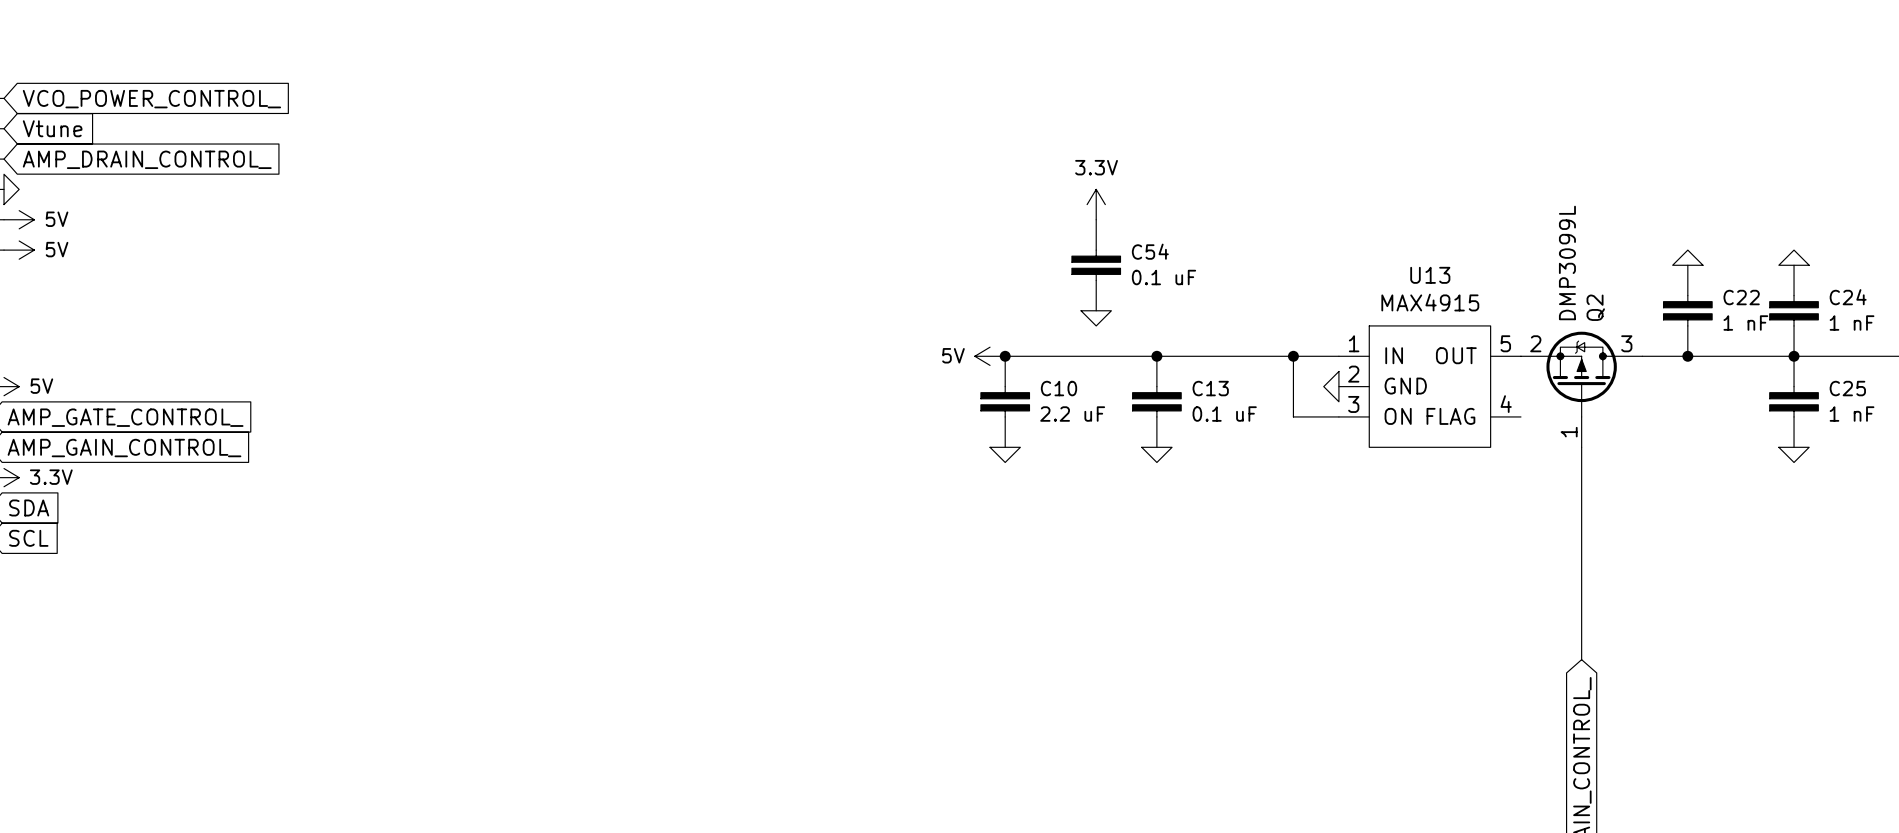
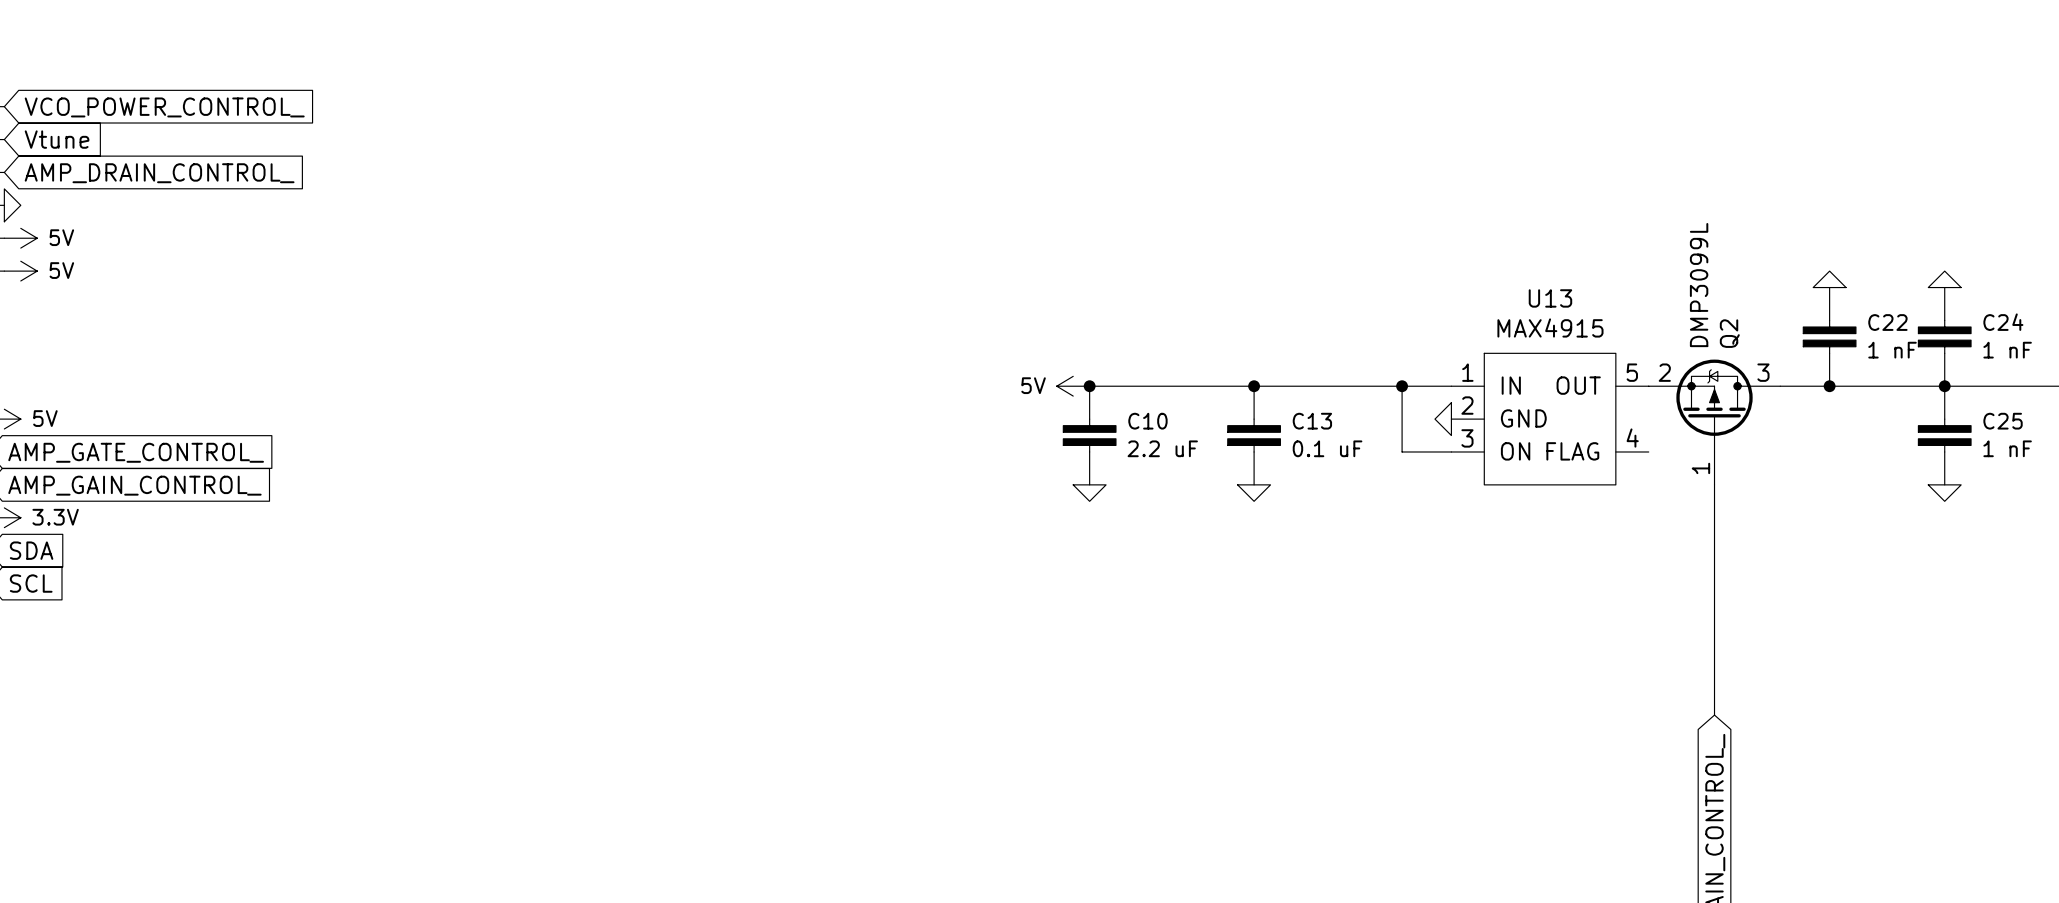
power symbol: 3.3V (1096, 204) -> none
C54: 0.1 uF (1096, 265) -> none
power symbol: (1096, 318) -> none

